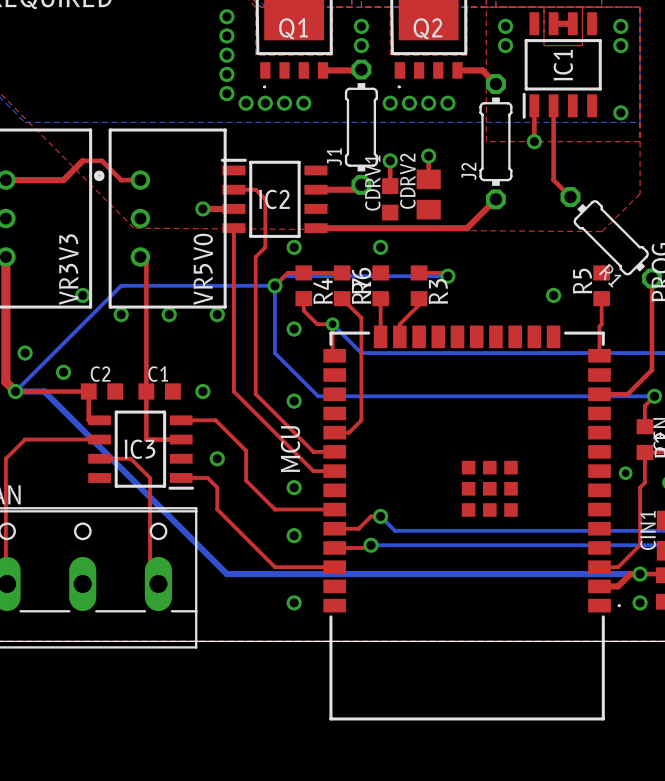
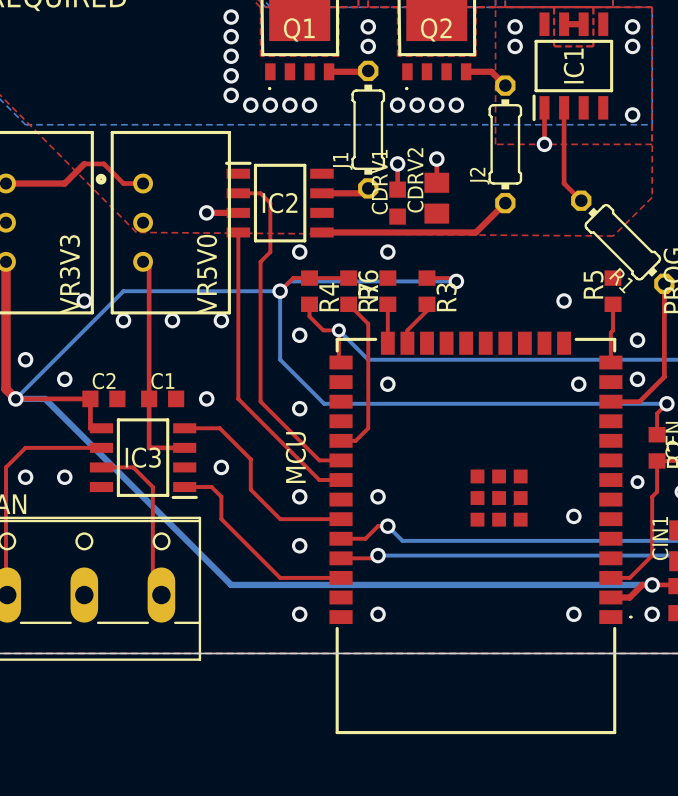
via: none -> (637, 340)
via: none -> (637, 379)
via: none -> (387, 384)
via: none -> (578, 384)
via: none -> (25, 477)
via: none -> (64, 477)
via: none -> (378, 496)
via: none -> (573, 516)
via: none -> (378, 614)
via: none -> (573, 614)

